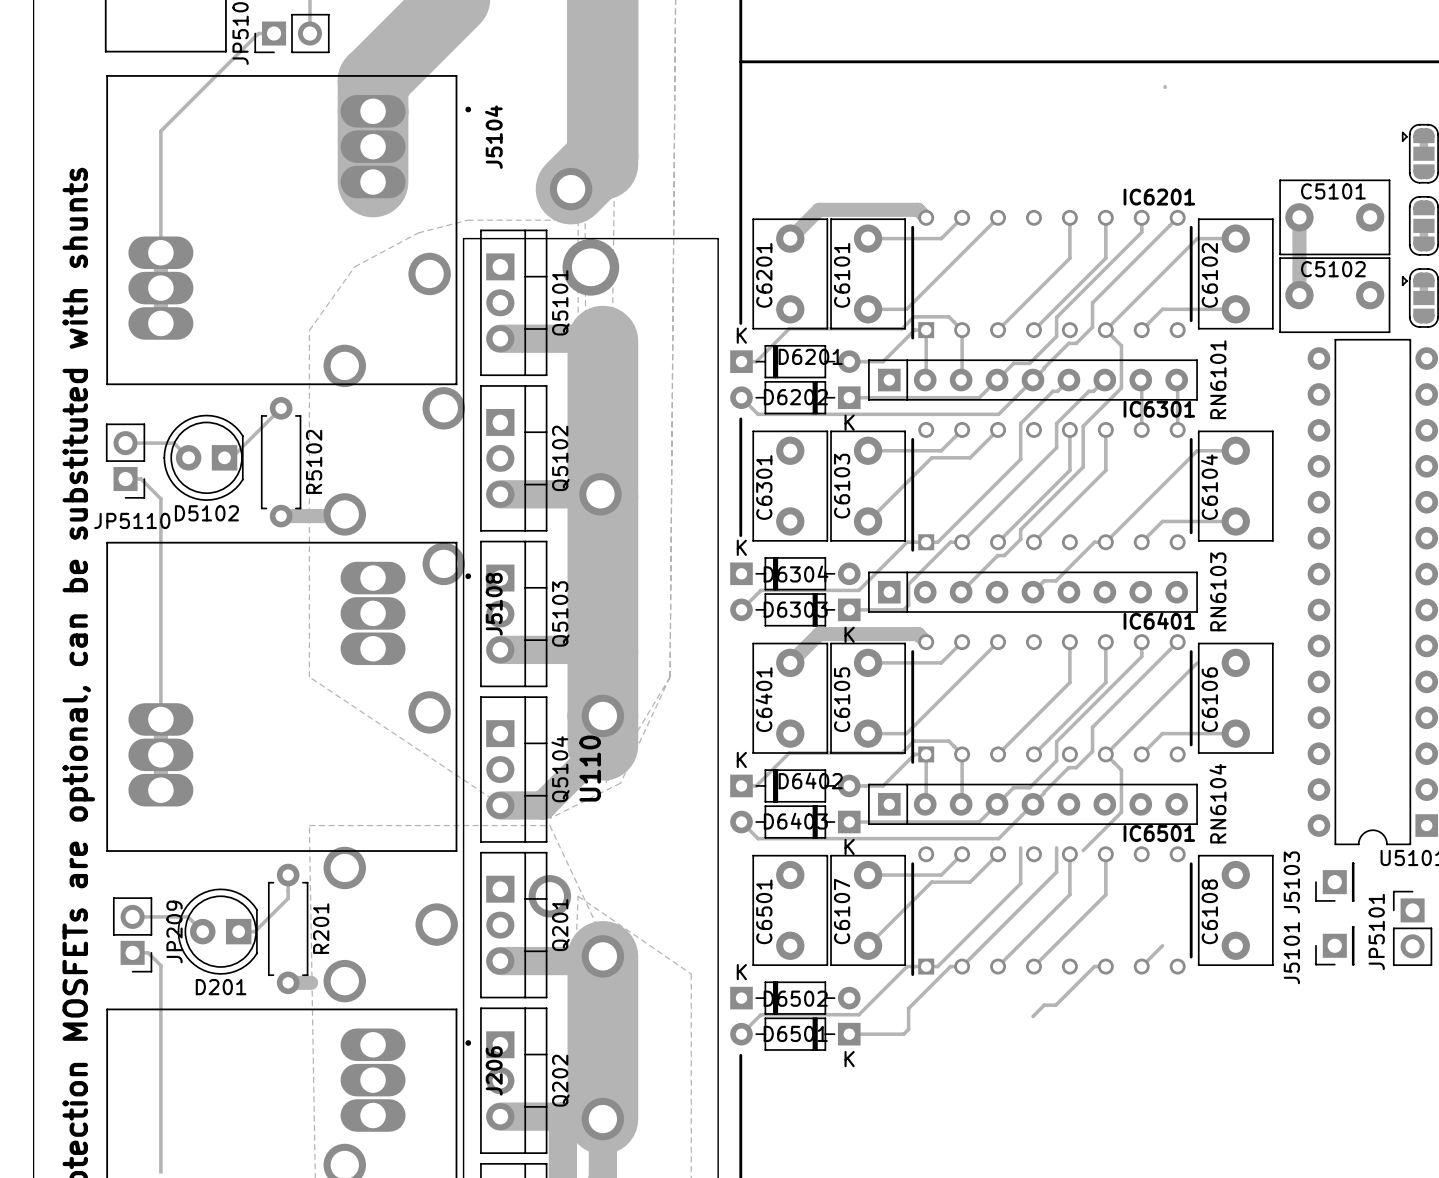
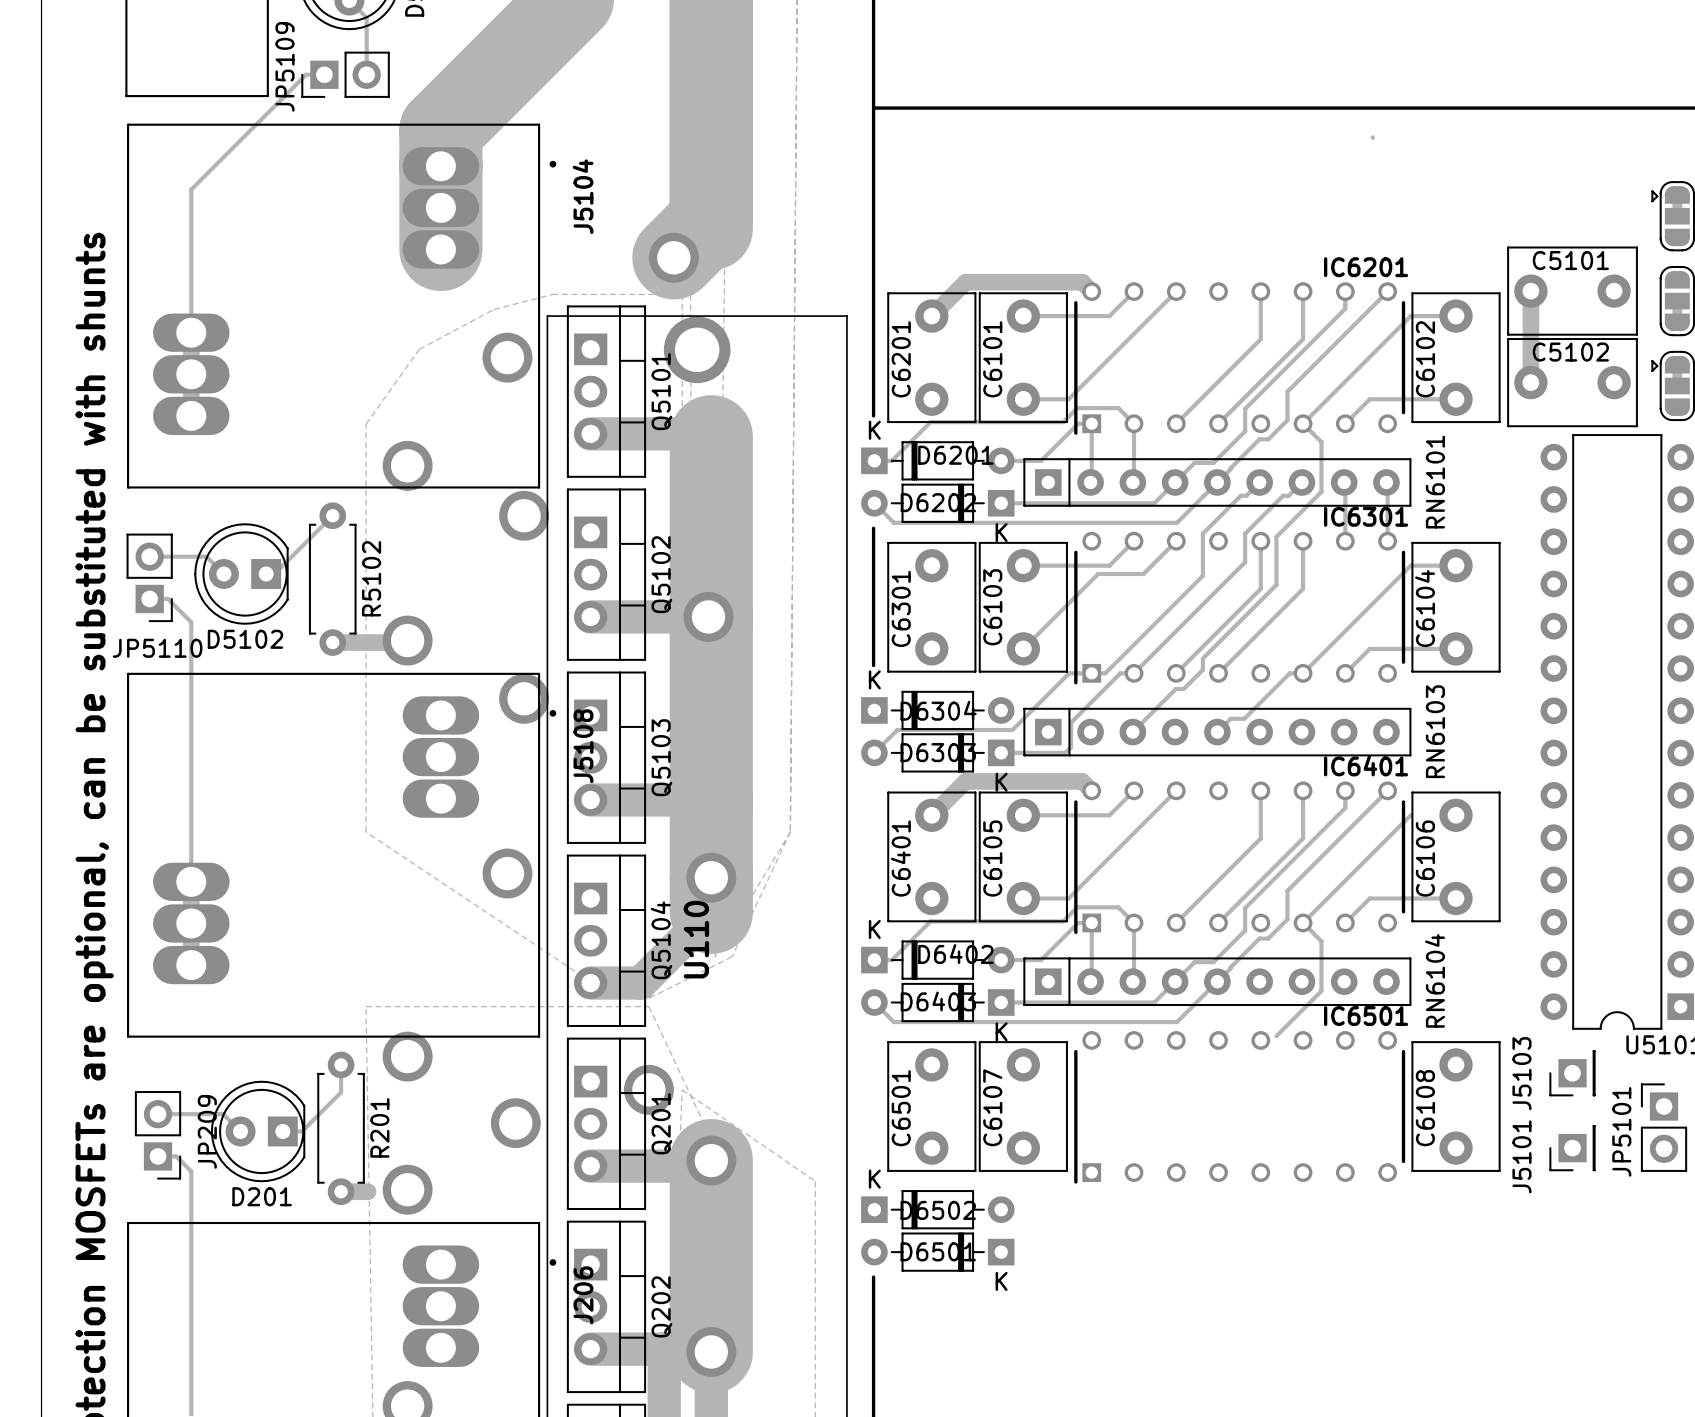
track: (1020, 847) (1020, 883) (937, 966) (907, 966) (858, 1014) (760, 1014) (741, 1034) -> none
track: (1056, 847) (1056, 872) (962, 966) (950, 966) (908, 1008) (908, 1029) (903, 1034) (849, 1034) -> none
track: (962, 854) (941, 875) (868, 875) -> none
track: (998, 854) (970, 882) (931, 882) (868, 945) -> none
track: (1069, 854) (1069, 894) (998, 966) -> none
track: (1105, 854) (1105, 894) (1033, 966) -> none
track: (1162, 945) (1141, 966) -> none
track: (1105, 966) (1094, 966) (1055, 1005) (1044, 1005) (1032, 1016) -> none

